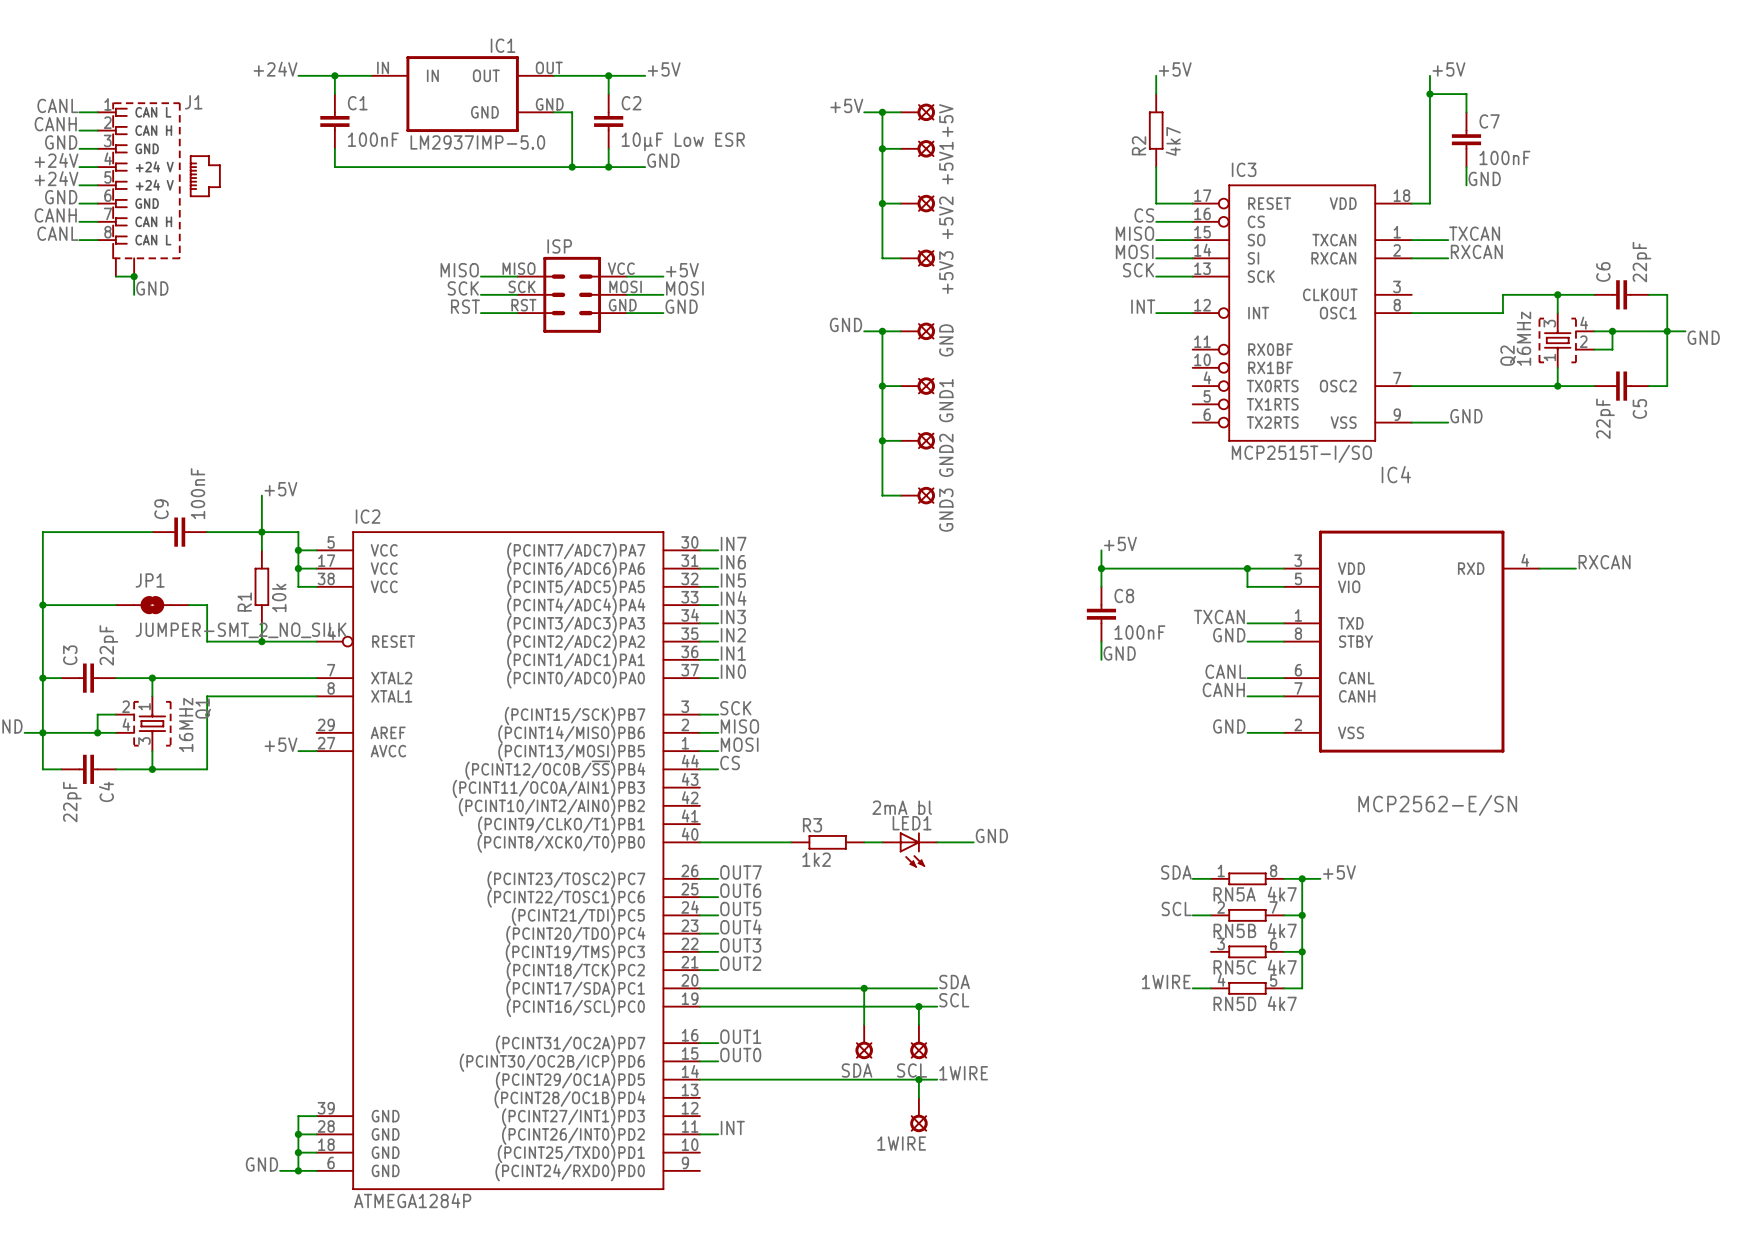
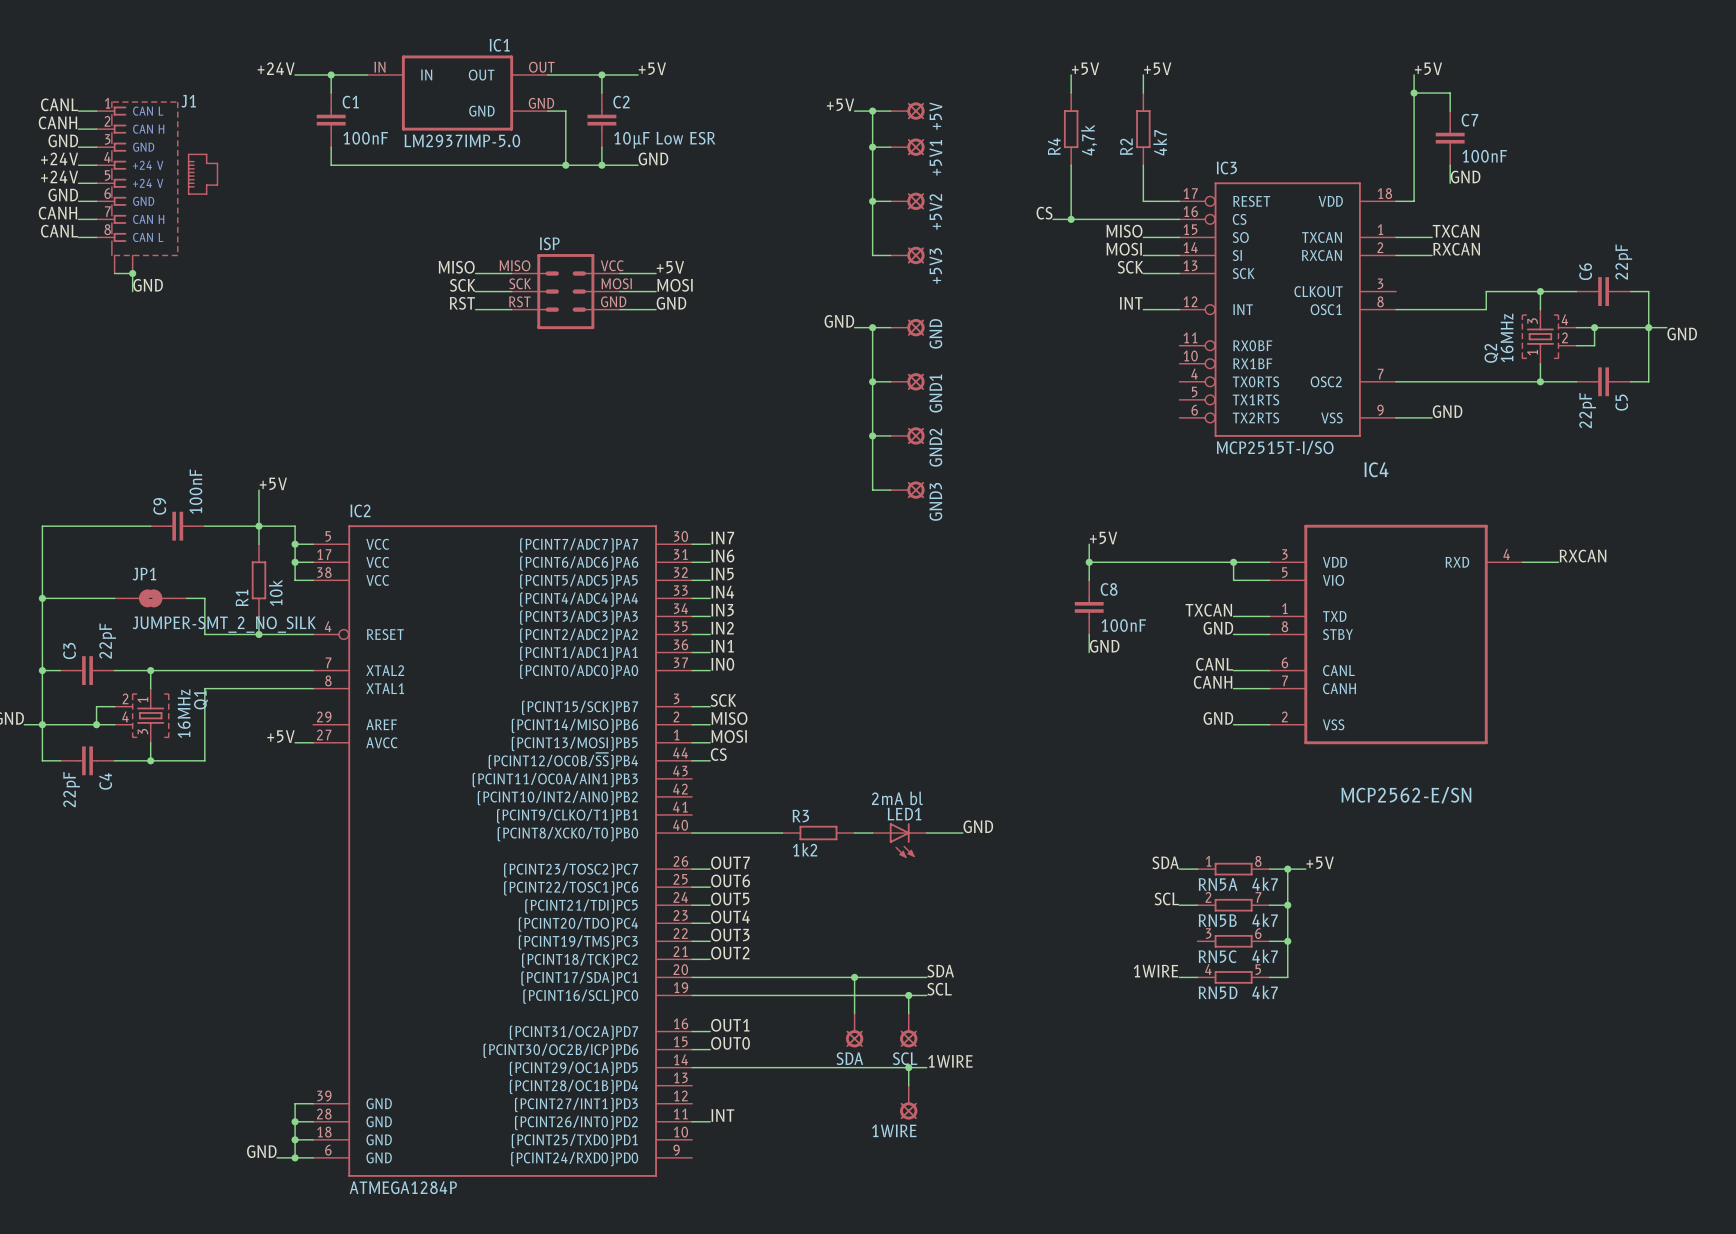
label: none -> +5V (1085, 68)
wire: none -> (1071, 74) (1071, 93)
R4: none -> 4,7k (1071, 129)
wire: none -> (1071, 165) (1071, 219)
label position: CS (1144, 215) -> CS (1044, 213)
wire: none -> (1053, 219) (1143, 219)
junction: none -> (1071, 219)

